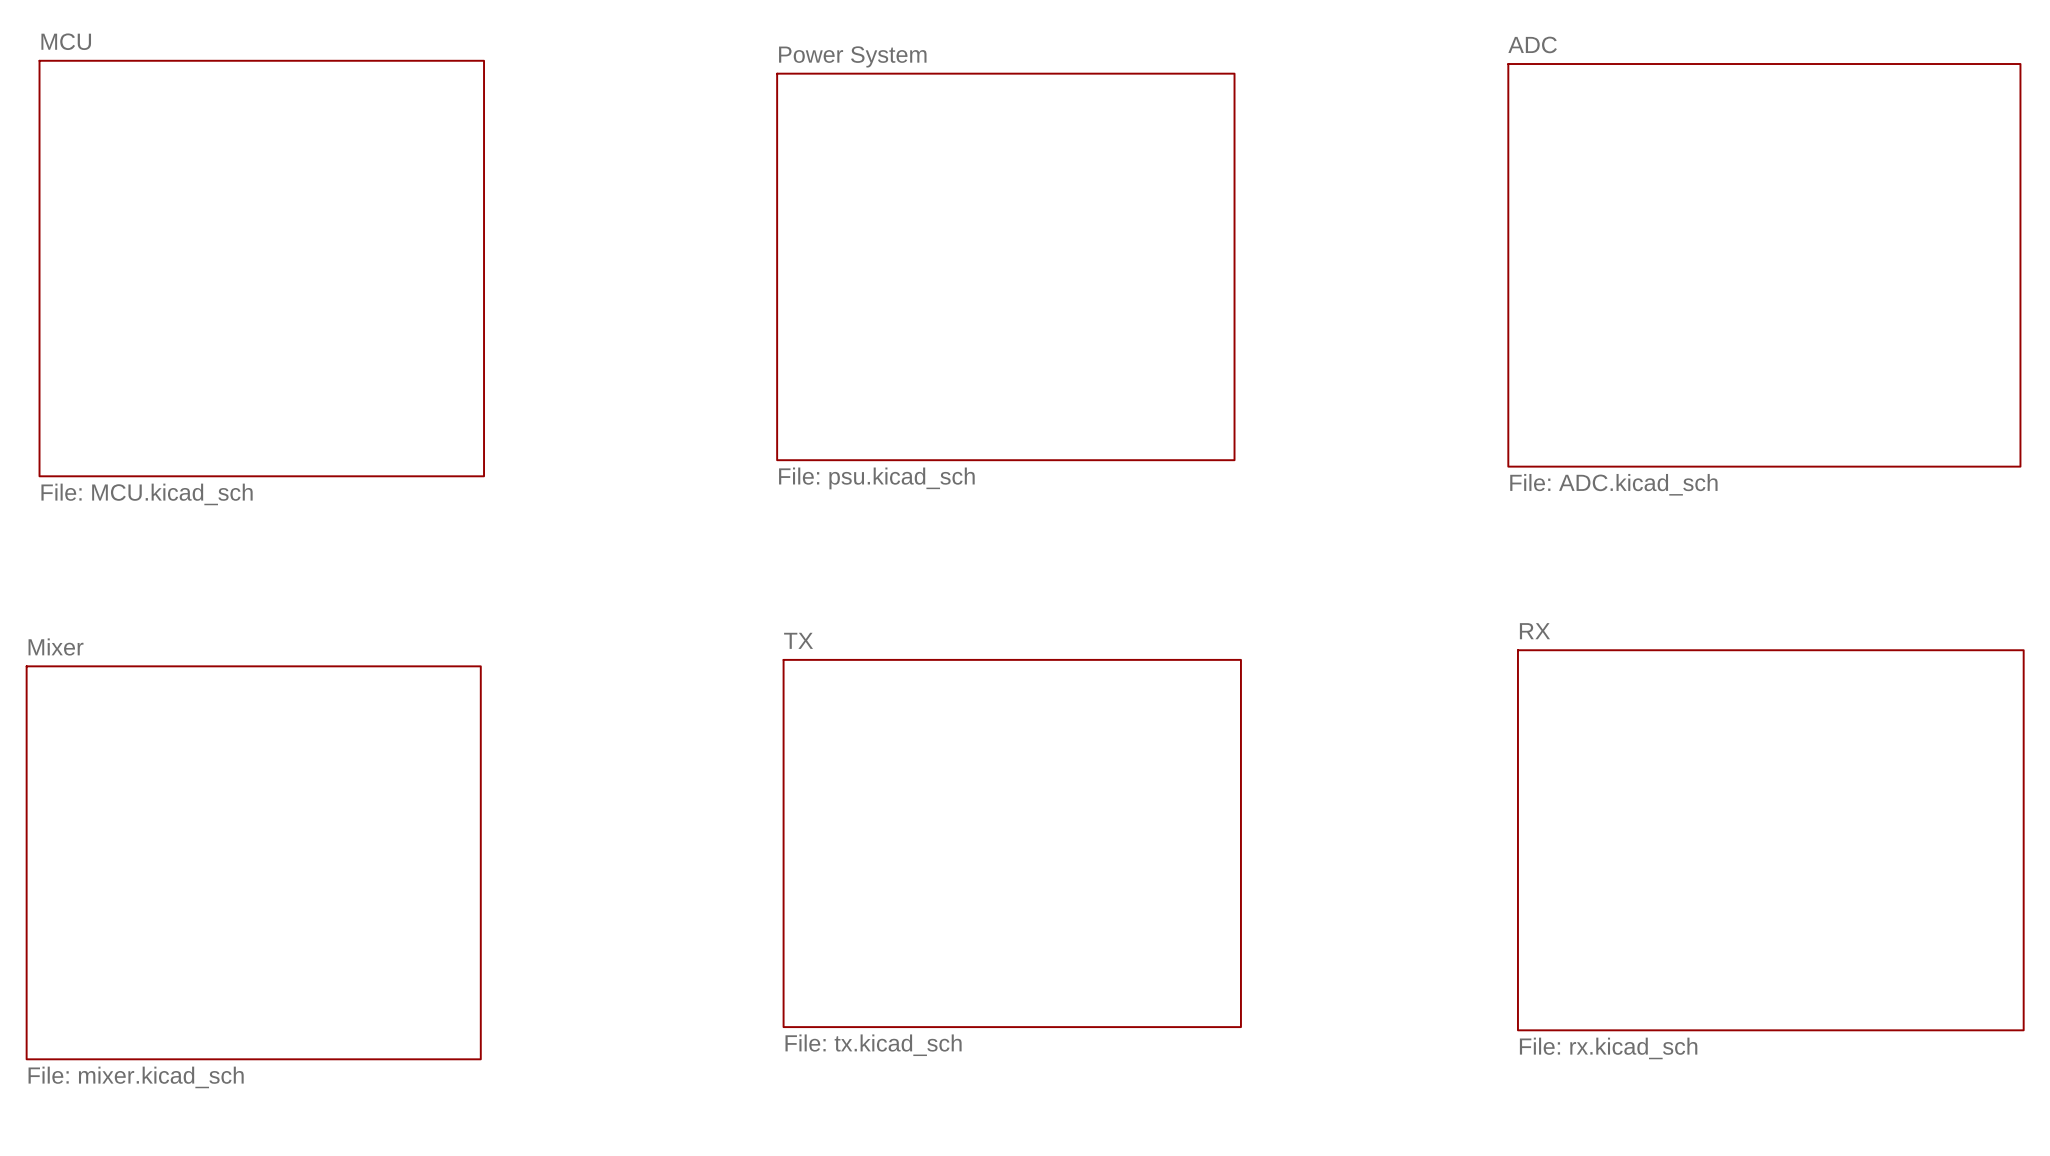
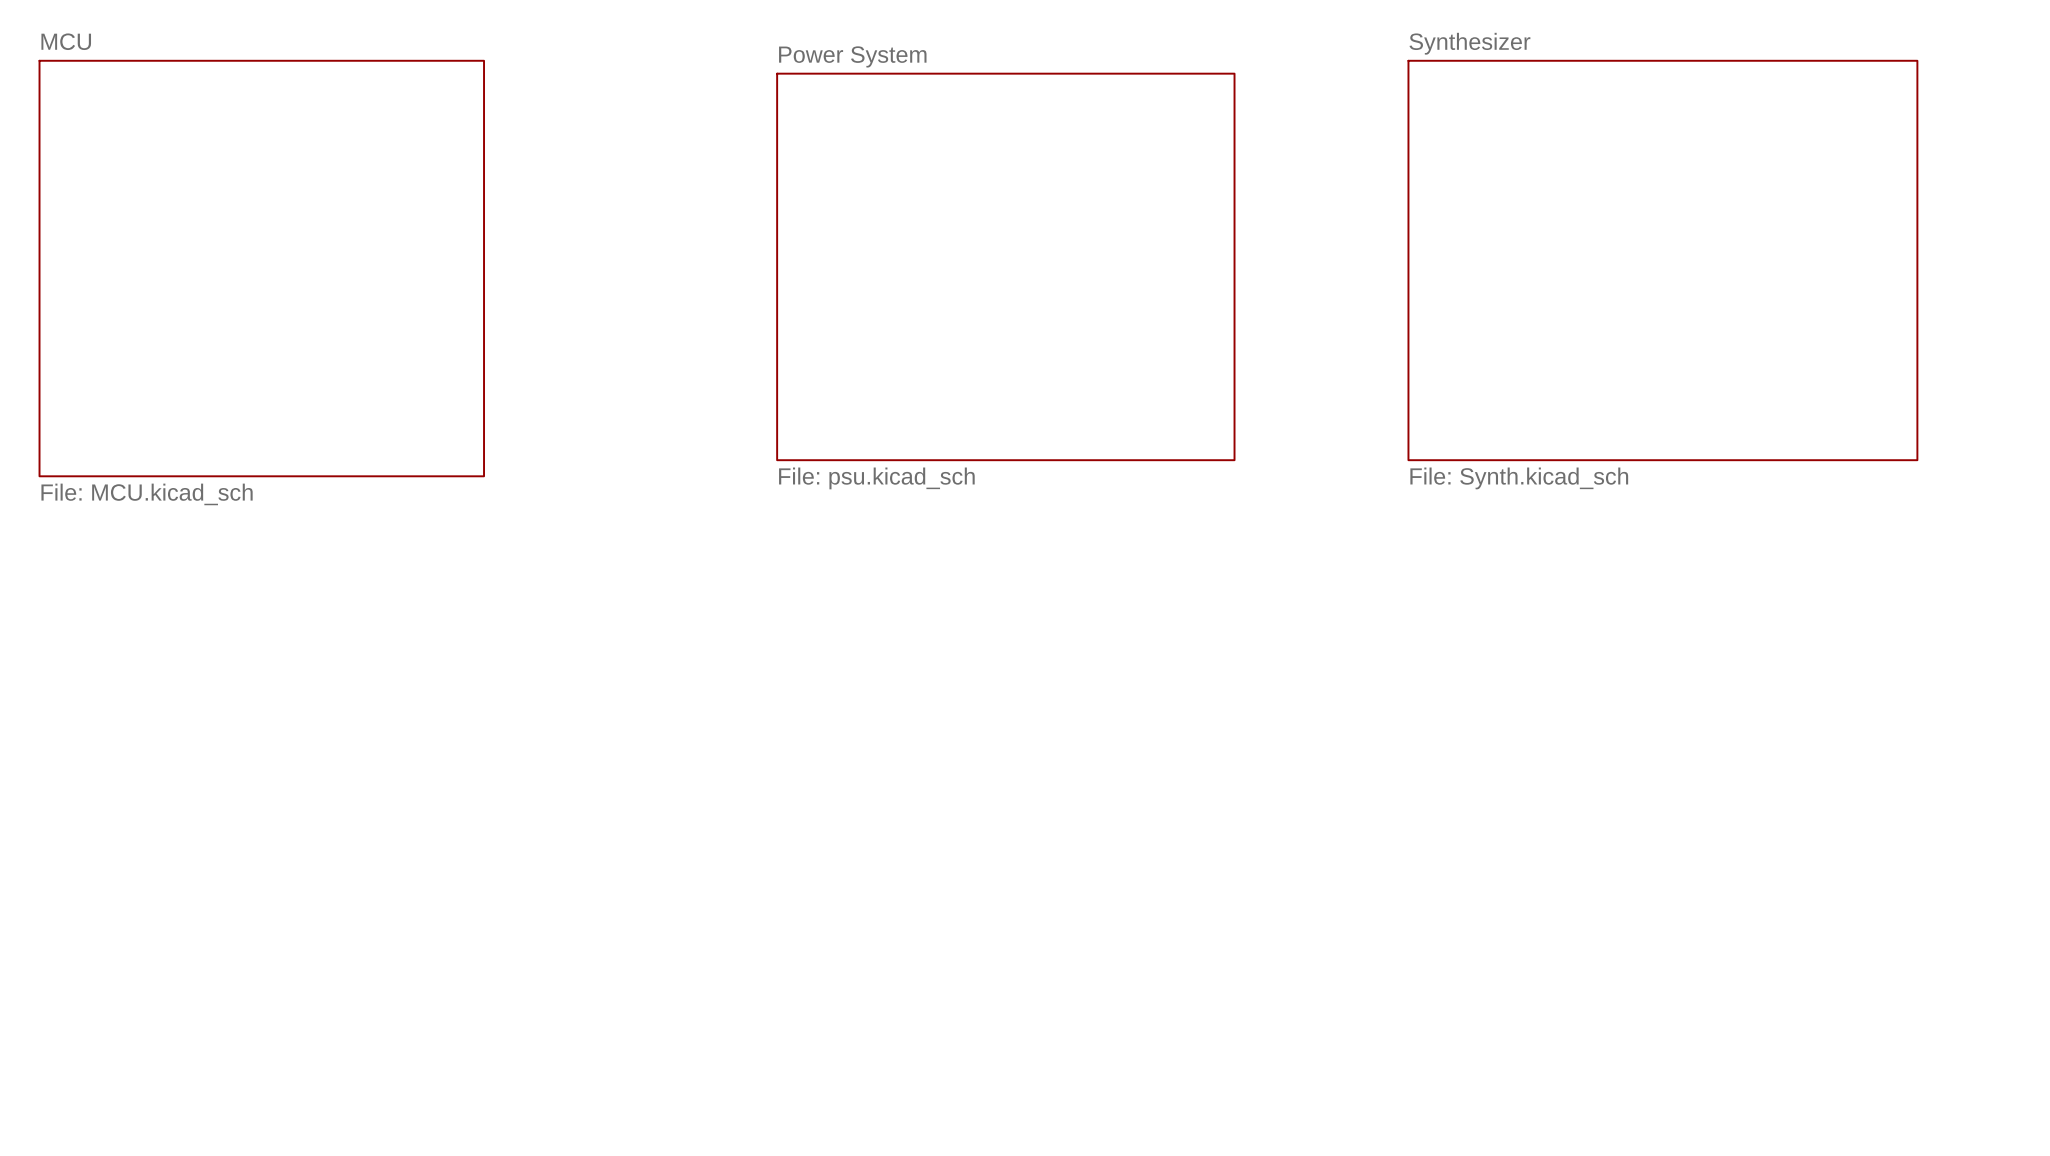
sheet Synthesizer: none -> File: Synth.kicad_sch (1662, 260)
sheet ADC: File: ADC.kicad_sch (1764, 265) -> none
sheet RX: File: rx.kicad_sch (1770, 840) -> none
sheet TX: File: tx.kicad_sch (1012, 843) -> none
sheet Mixer: File: mixer.kicad_sch (253, 862) -> none

